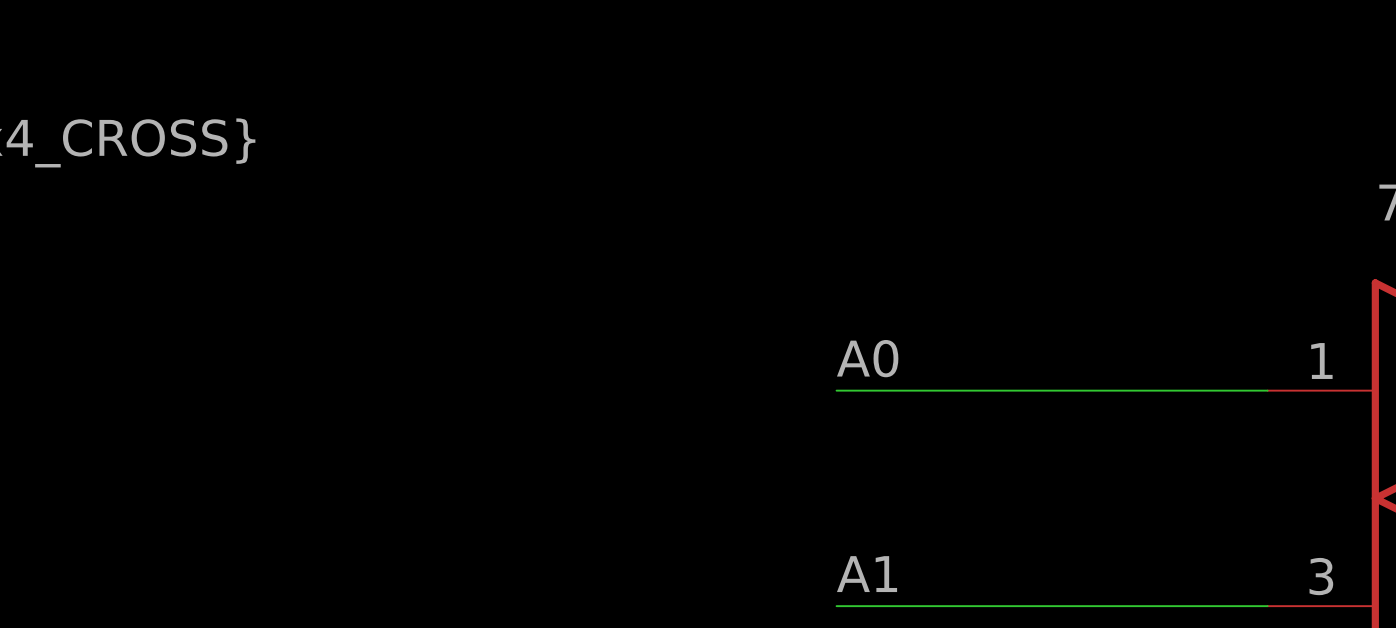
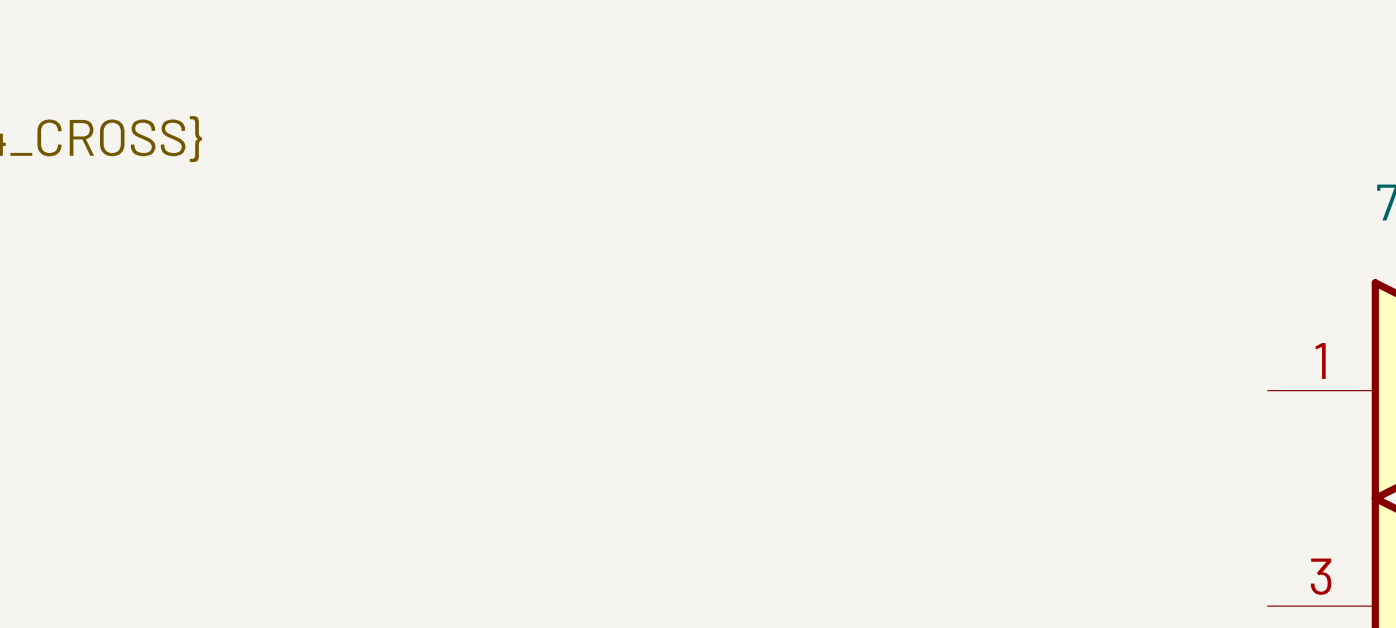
label: A0 (867, 358) -> none
wire: (836, 390) (1267, 390) -> none
label: A1 (867, 574) -> none
wire: (836, 606) (1267, 606) -> none

